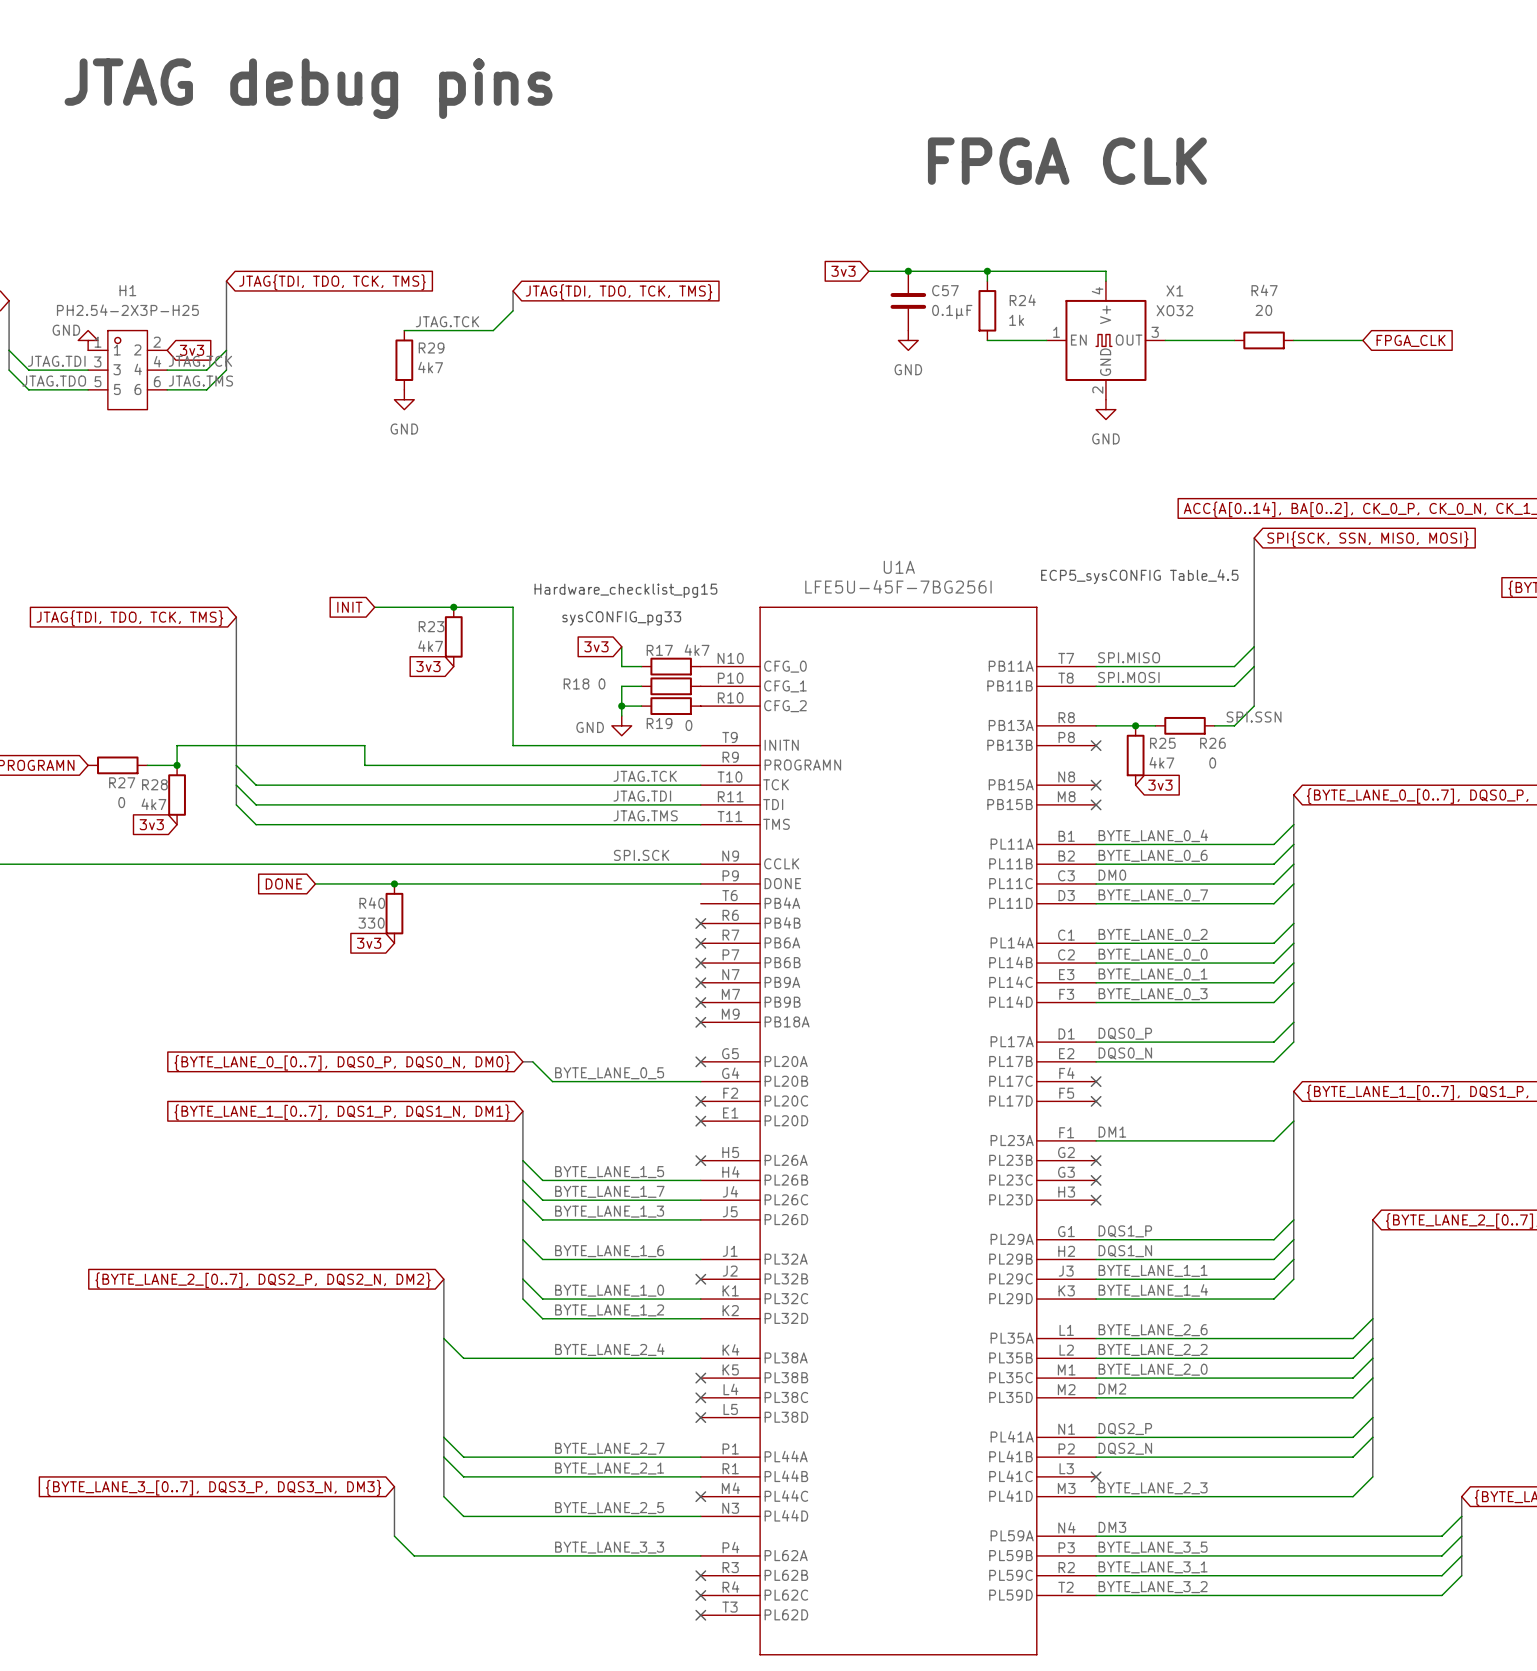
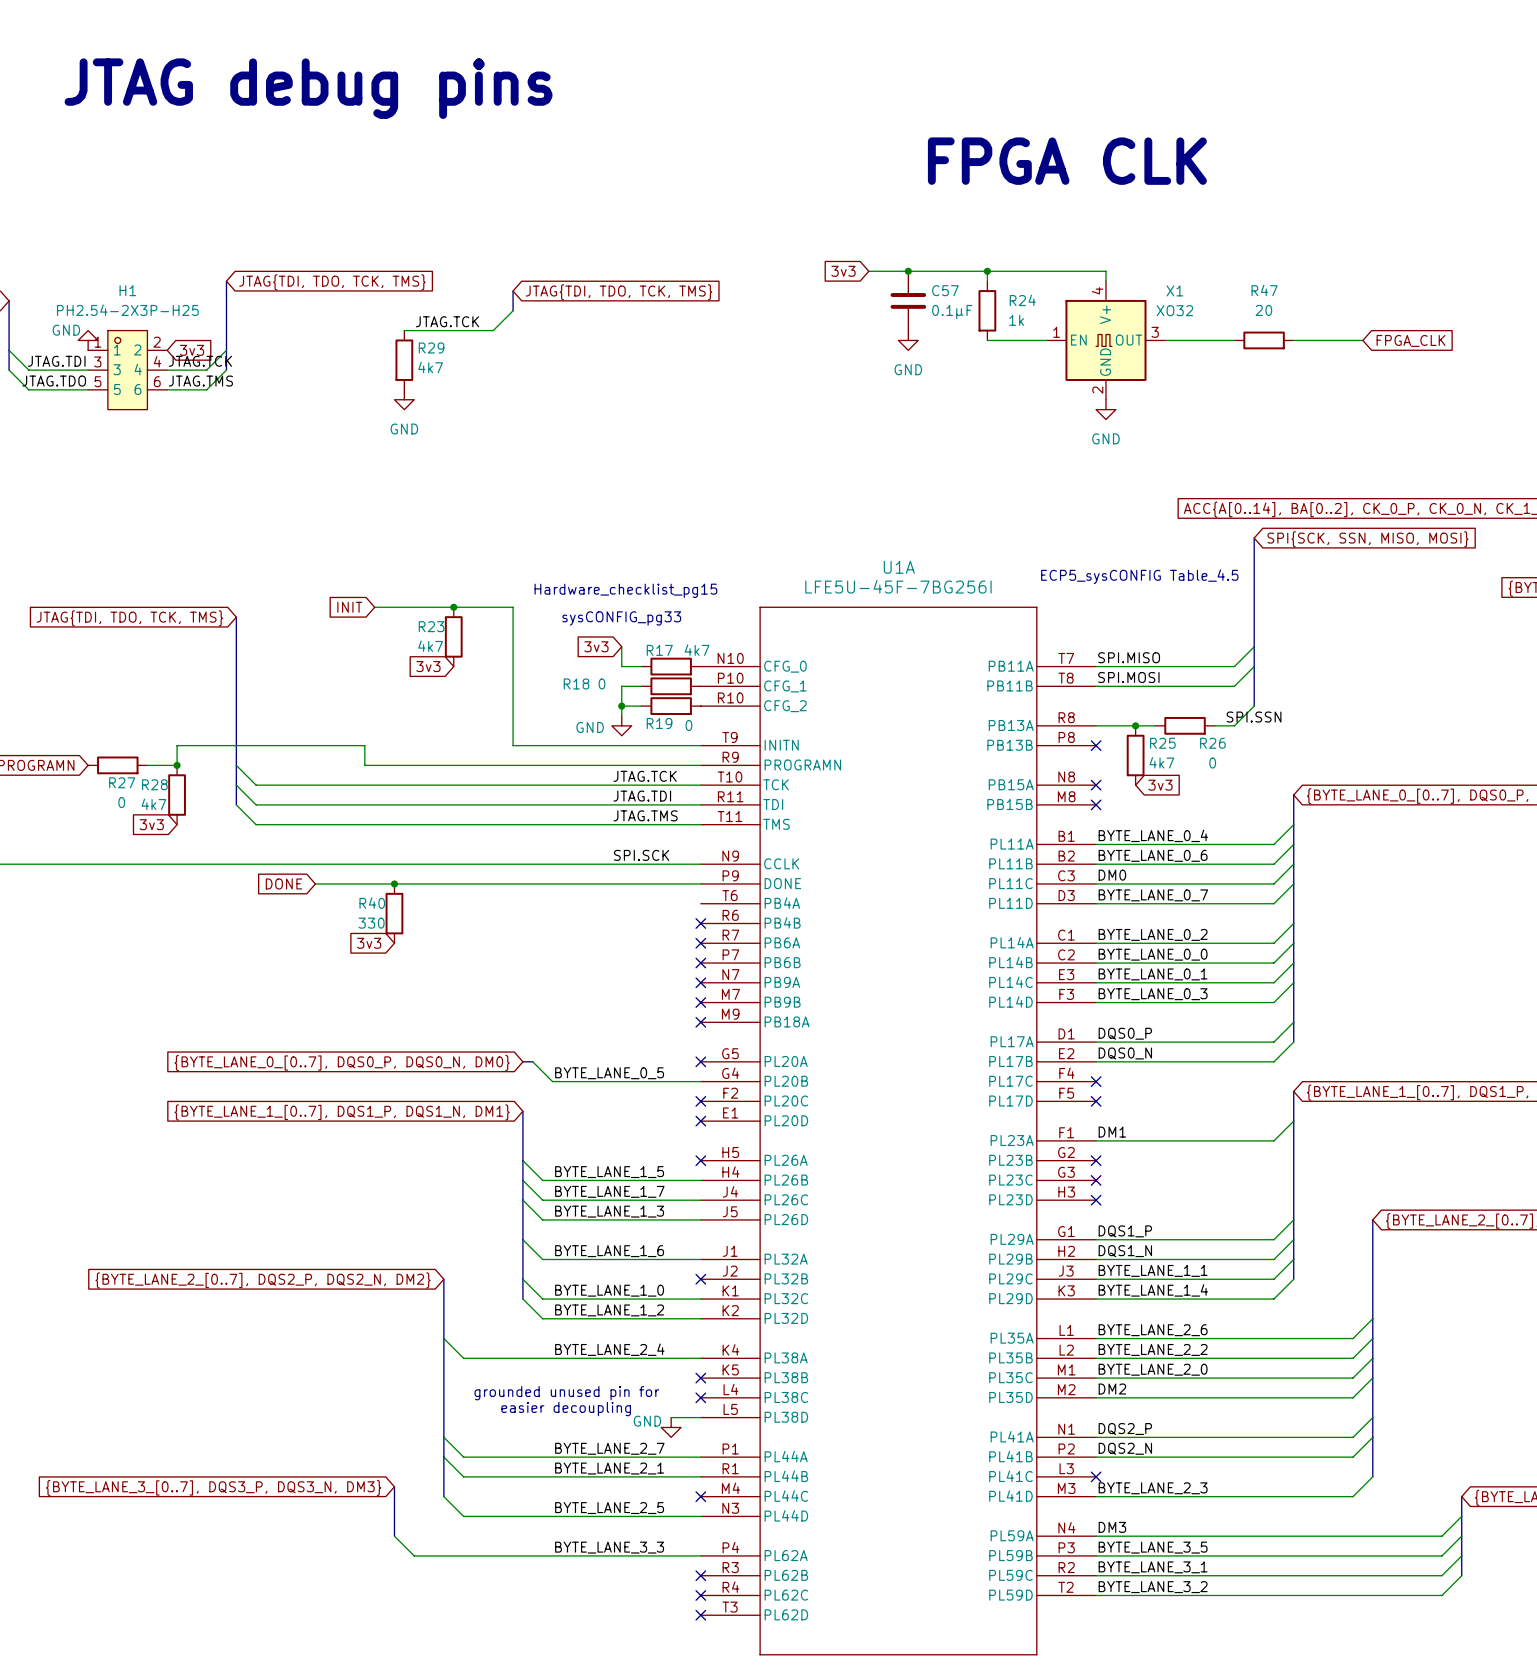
text: none -> grounded unused pin for (566, 1393)
text: none -> easier decoupling (566, 1409)
wire: none -> (671, 1417) (700, 1417)
no-connect mark: (700, 1417) -> none
power symbol: none -> GND (671, 1427)

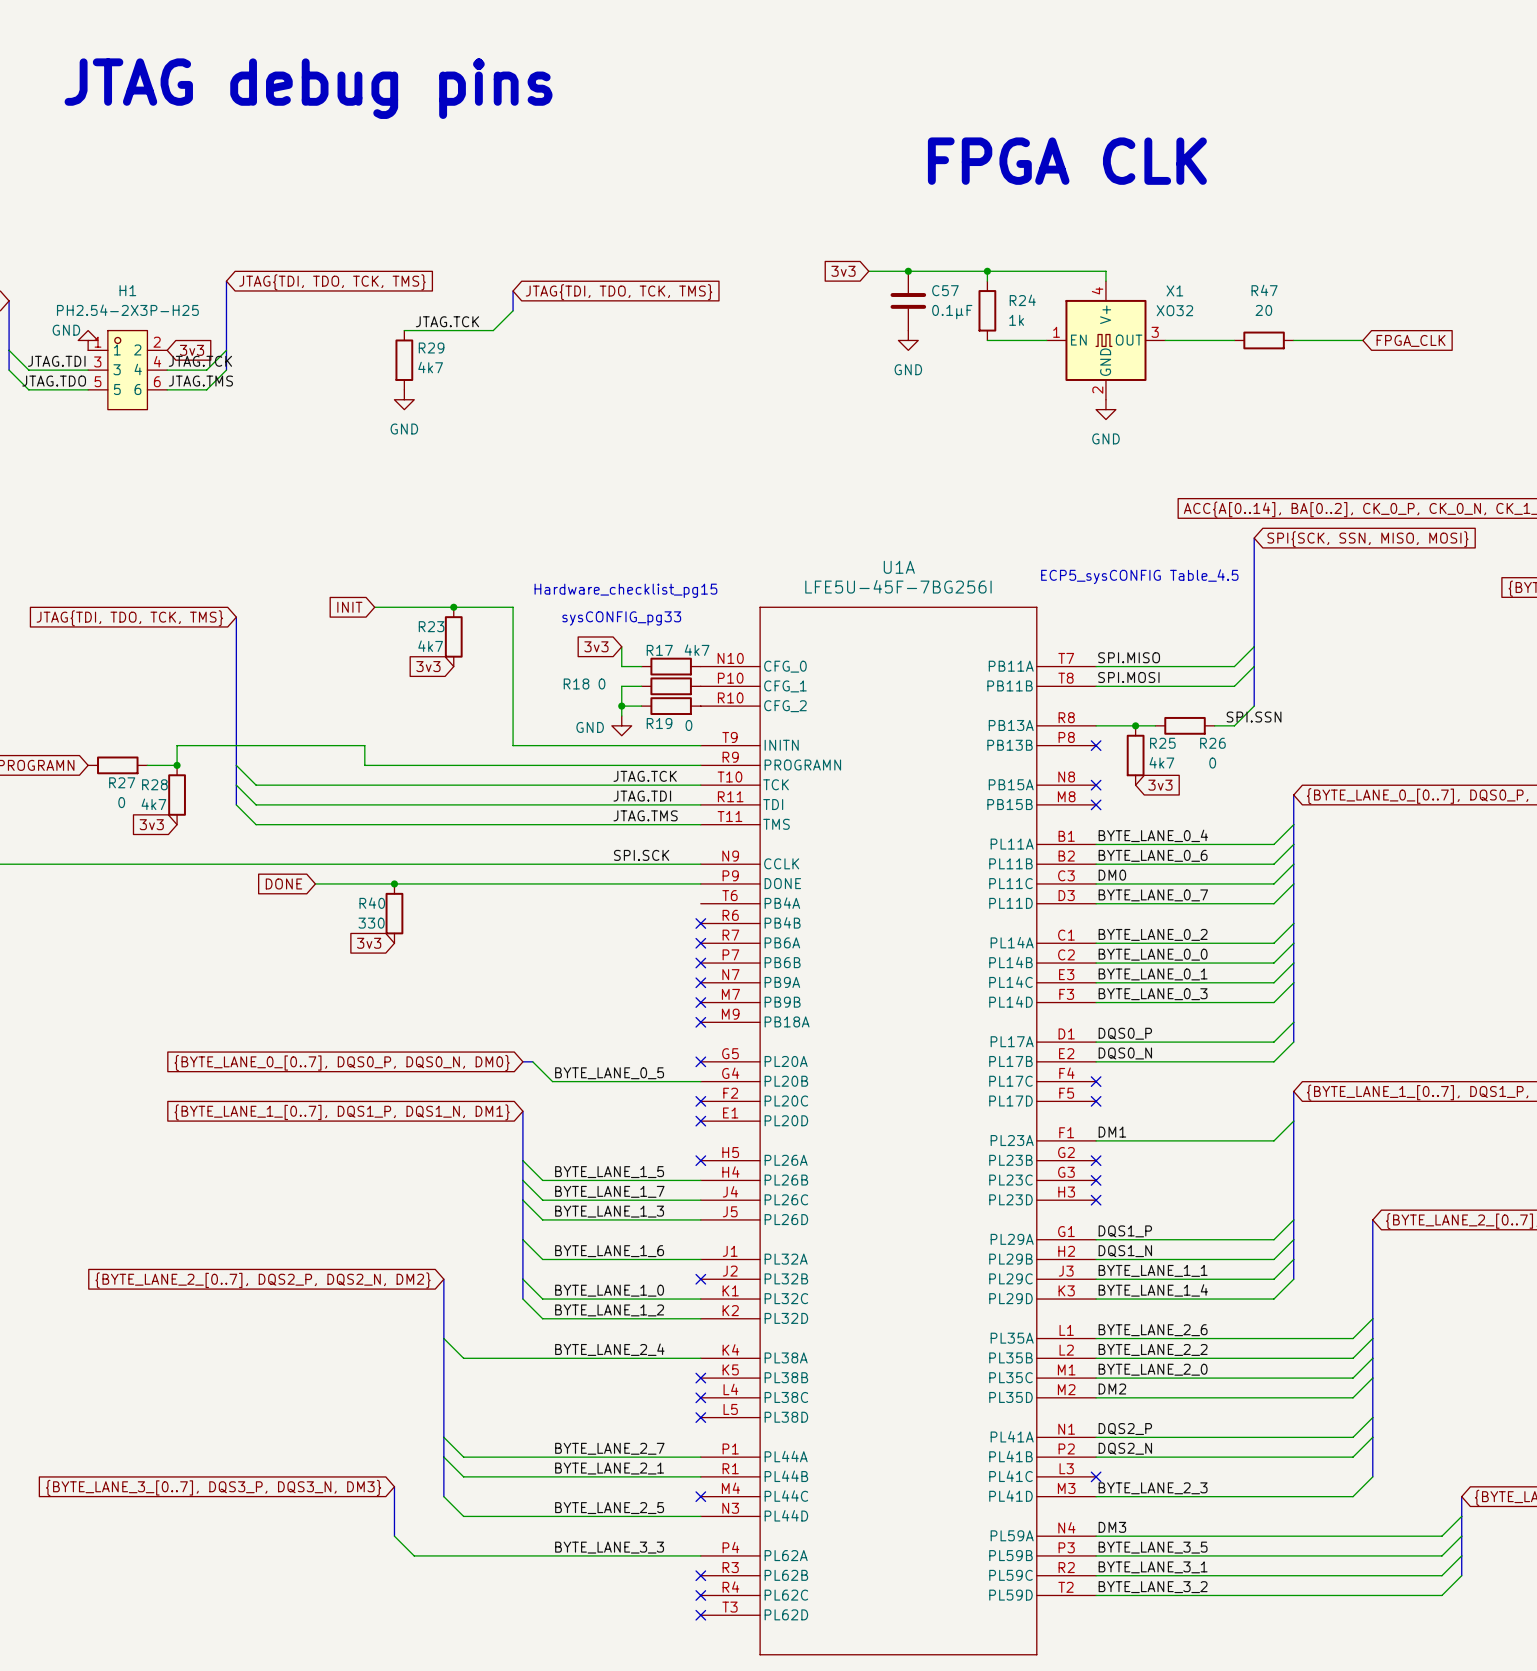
text: grounded unused pin for (566, 1393) -> none
text: easier decoupling (566, 1409) -> none
wire: (671, 1417) (700, 1417) -> none
no-connect mark: none -> (700, 1417)
power symbol: GND (671, 1427) -> none

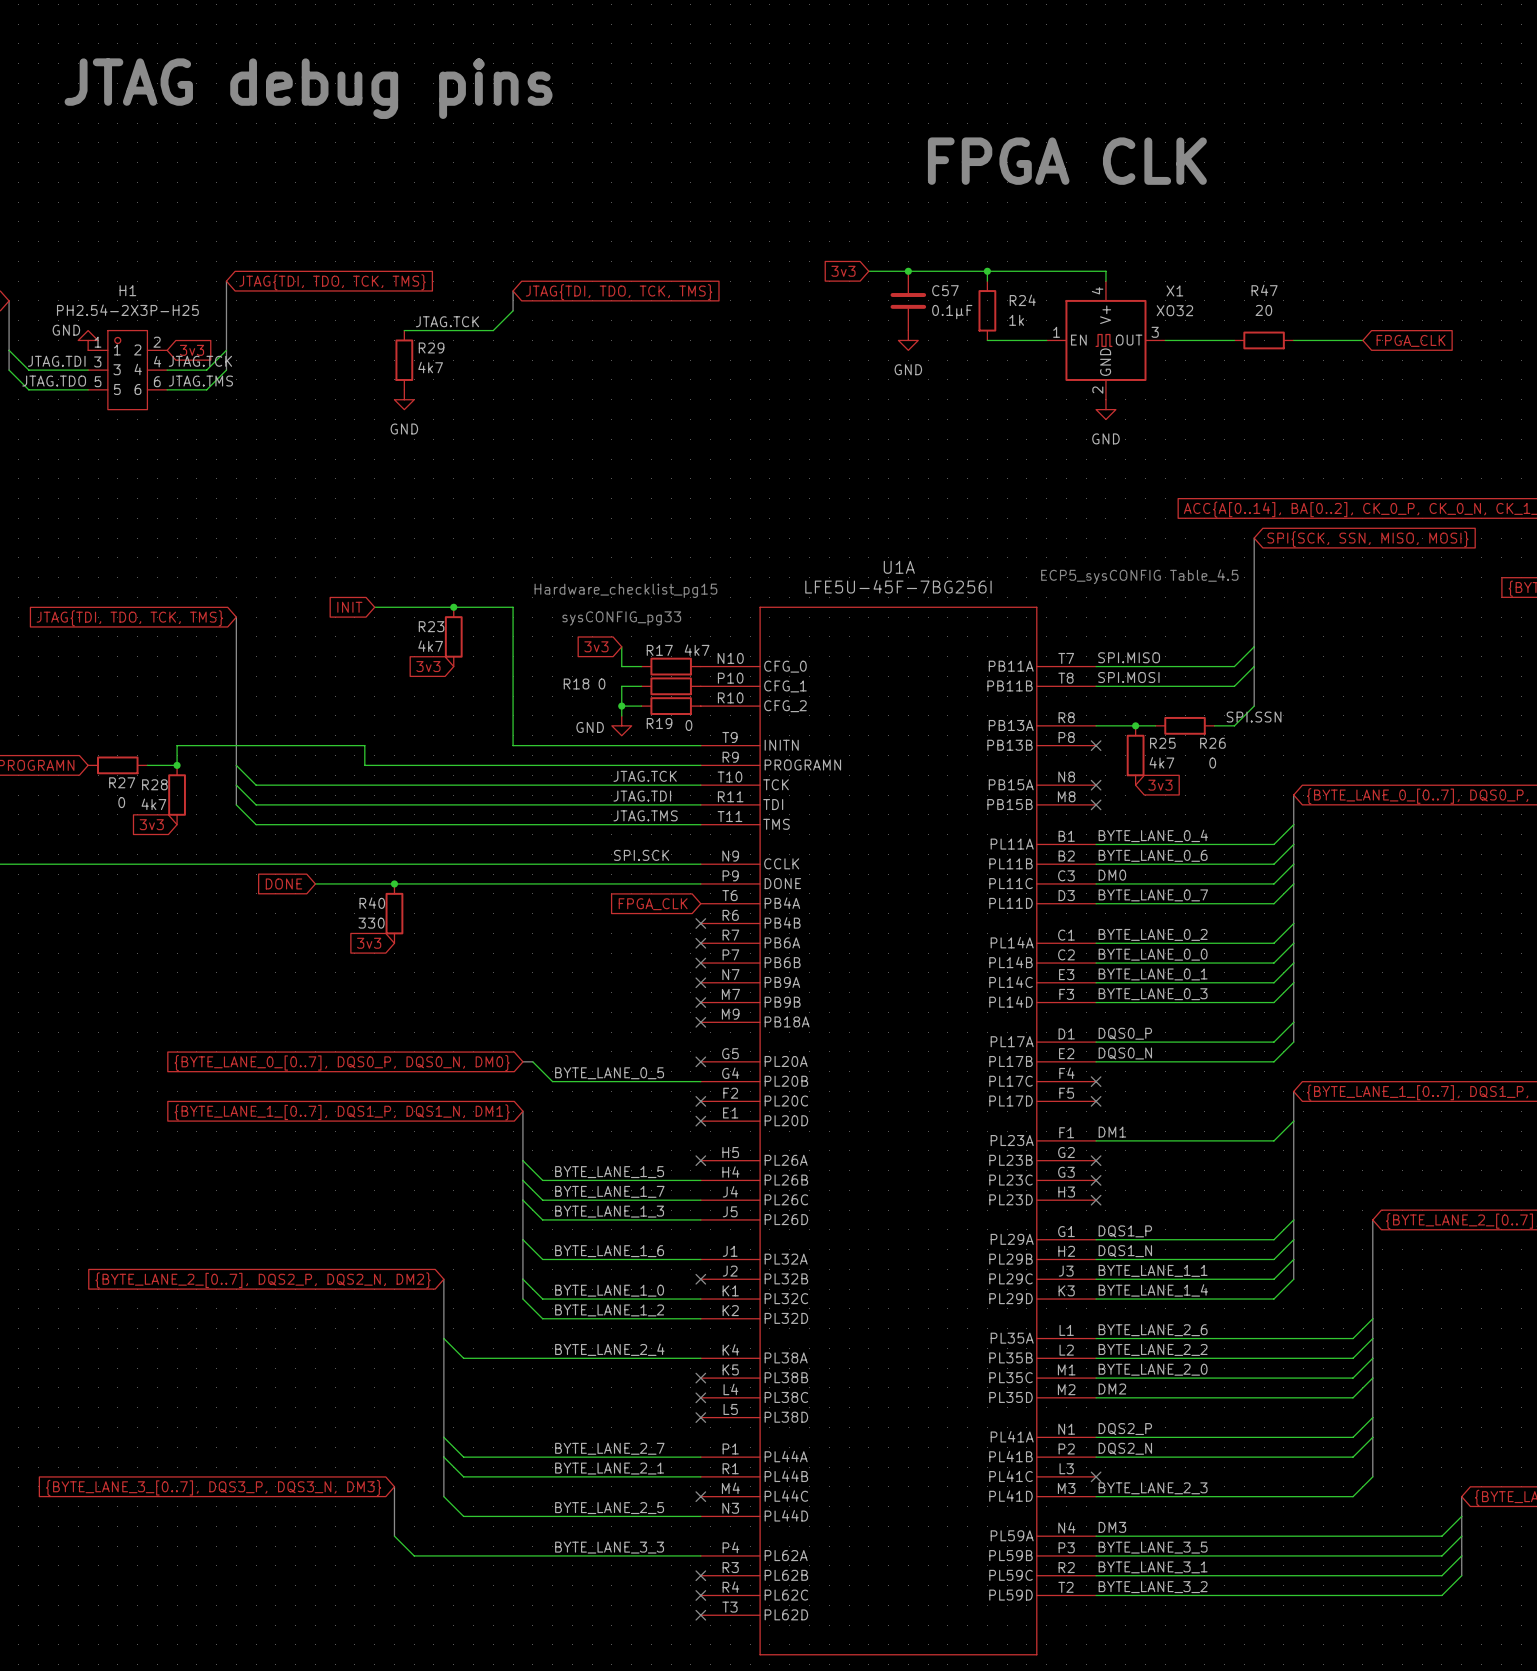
global label: none -> FPGA_CLK (653, 904)

